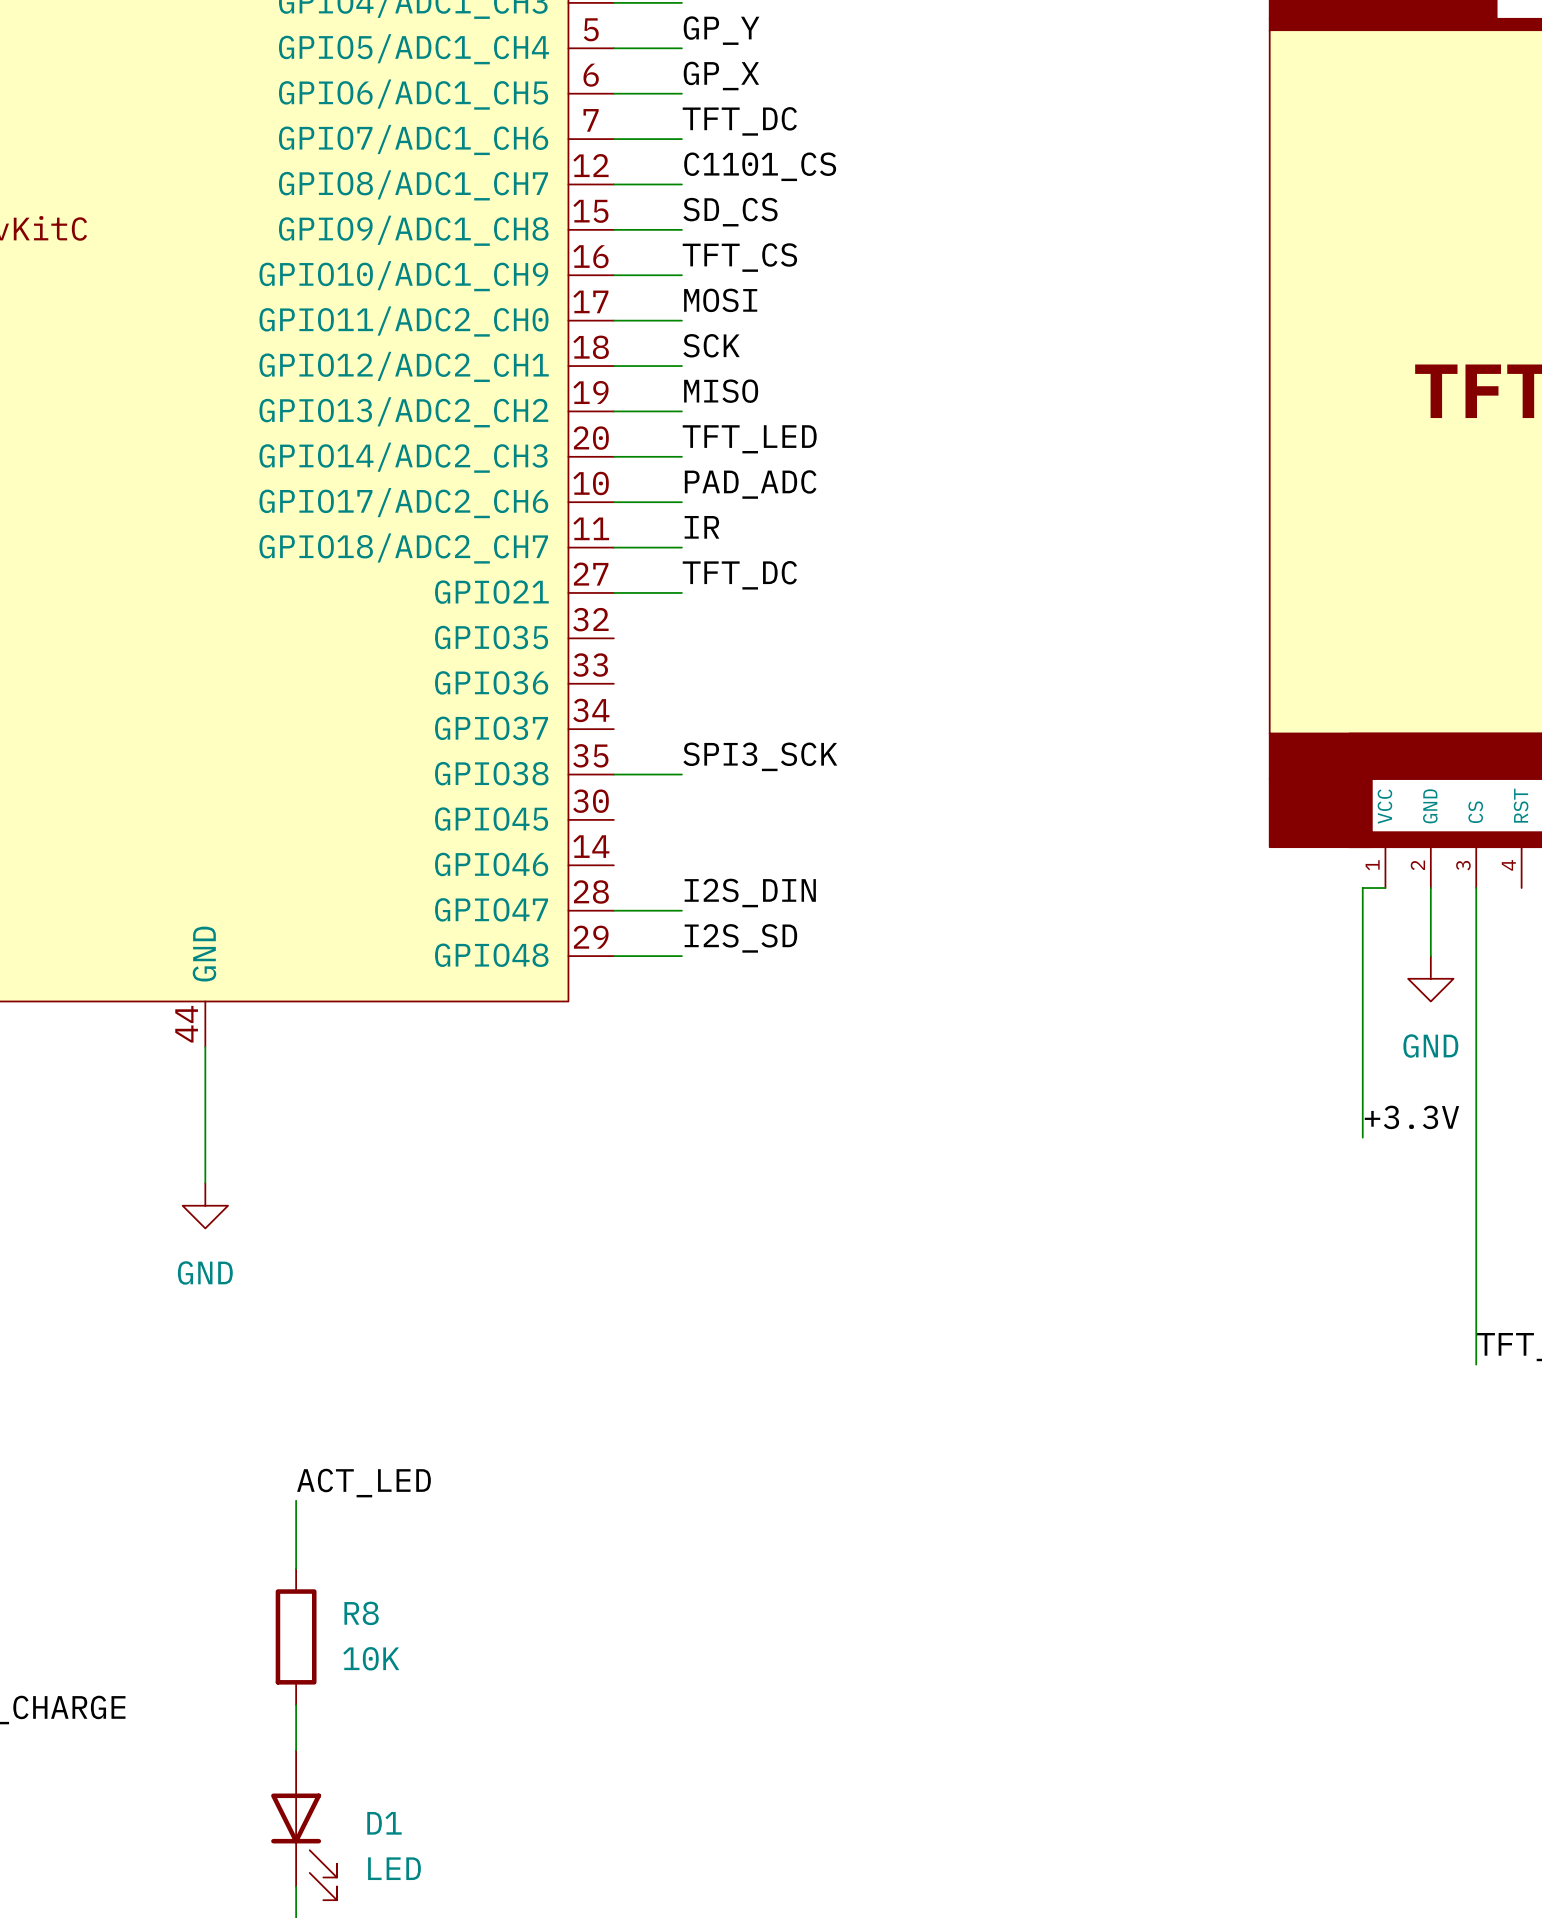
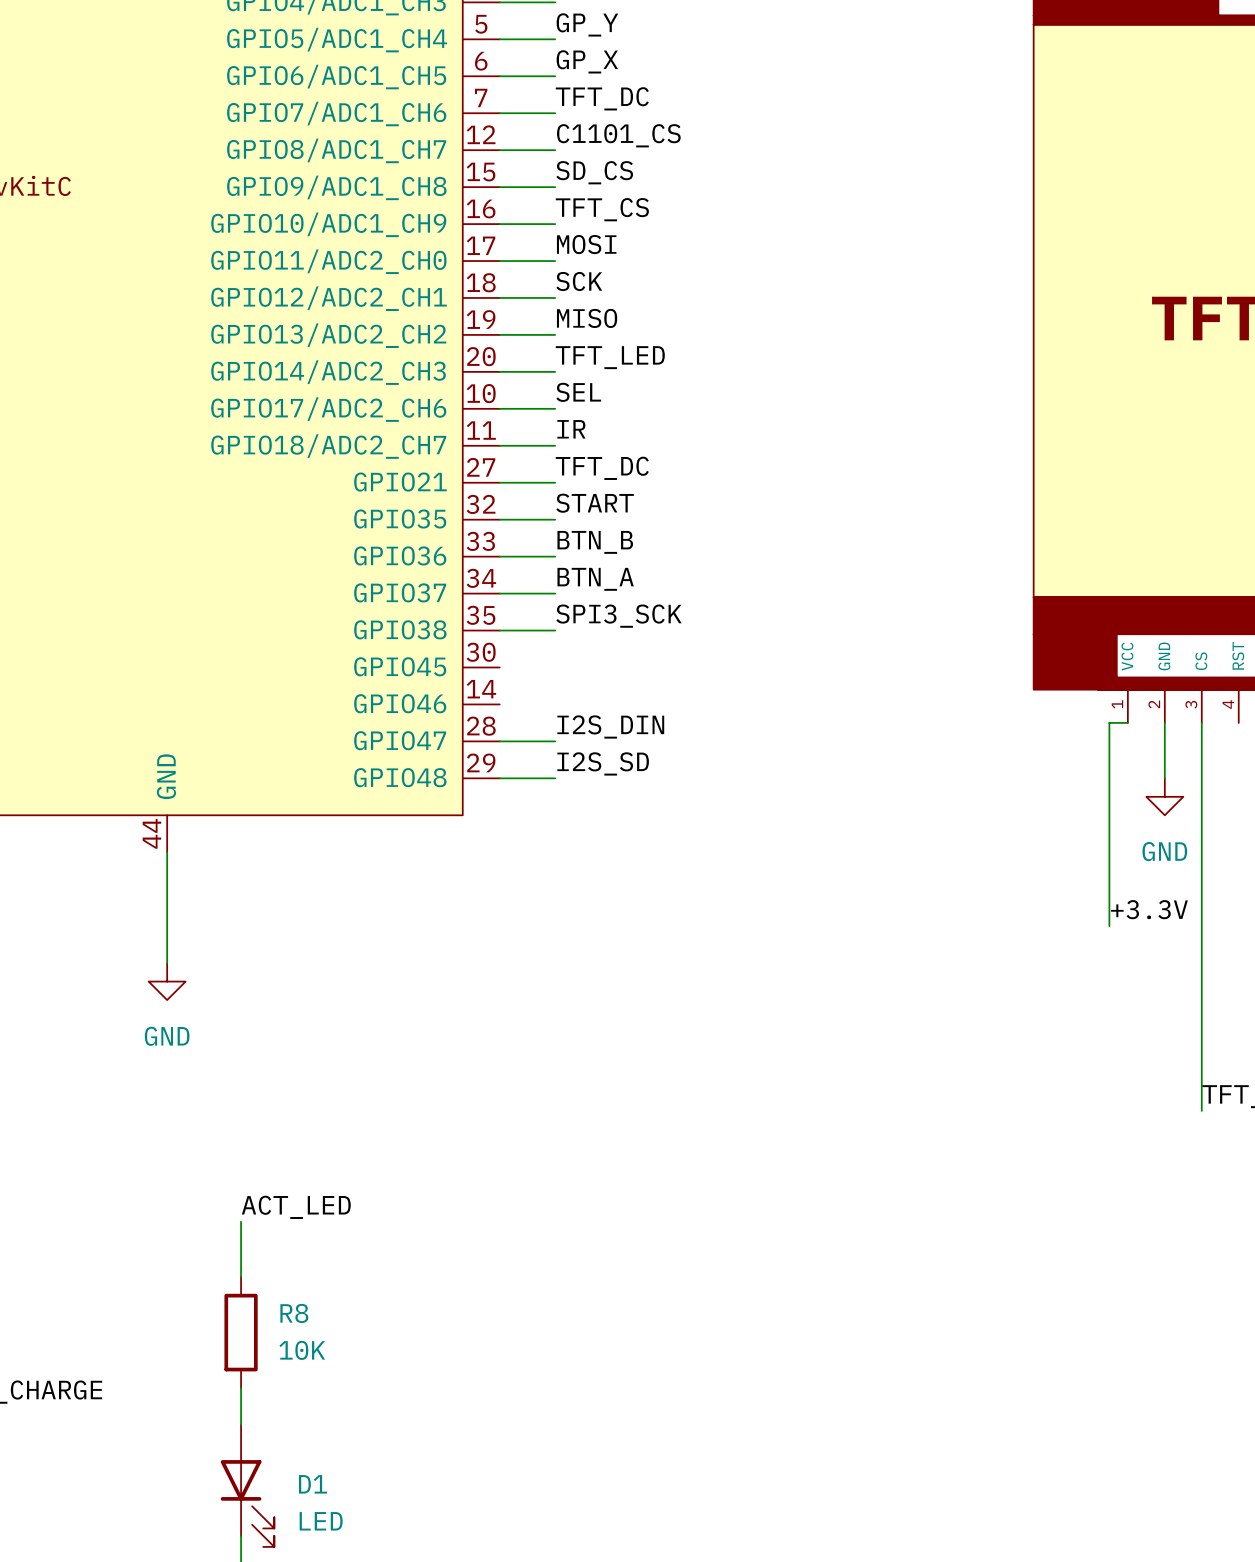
label: PAD_ADC (750, 484) -> SEL (578, 392)
label: none -> START (595, 503)
wire: none -> (499, 519) (555, 519)
label: none -> BTN_B (595, 542)
wire: none -> (499, 556) (555, 556)
label: none -> BTN_A (595, 579)
wire: none -> (499, 593) (555, 593)

